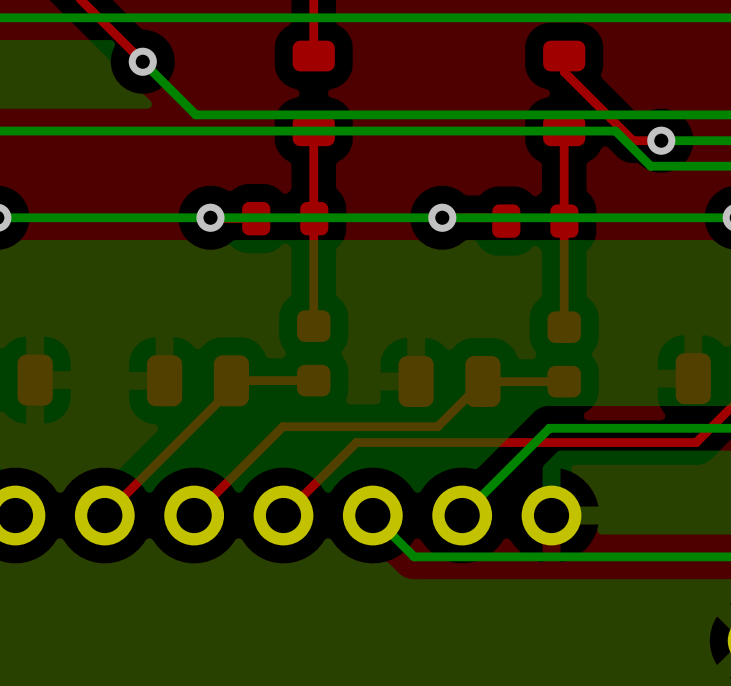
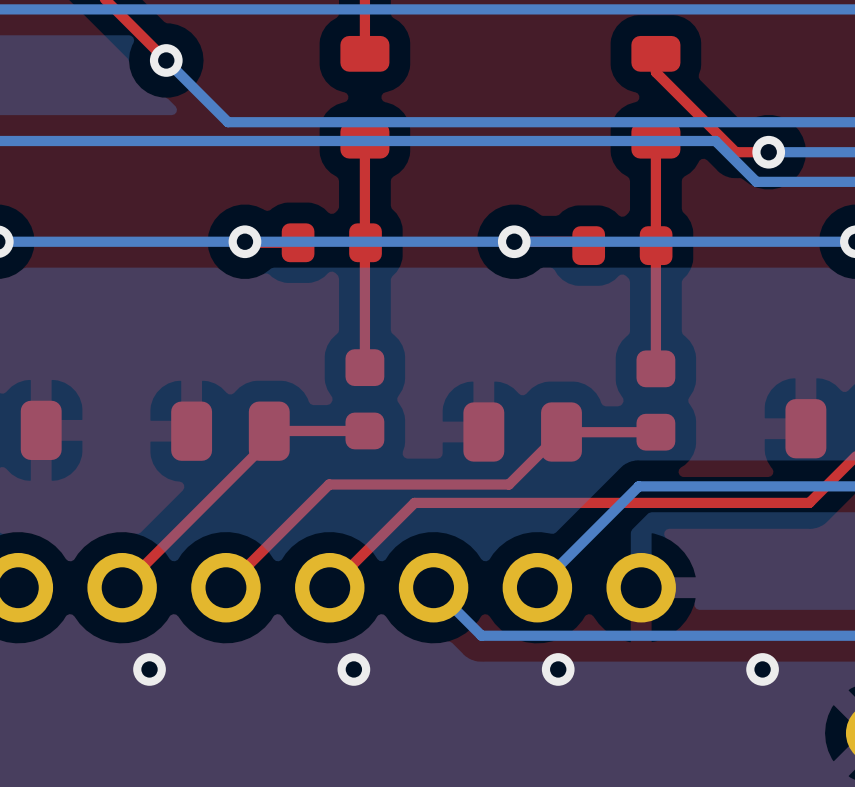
via: none -> (149, 669)
via: none -> (353, 669)
via: none -> (558, 669)
via: none -> (762, 669)

